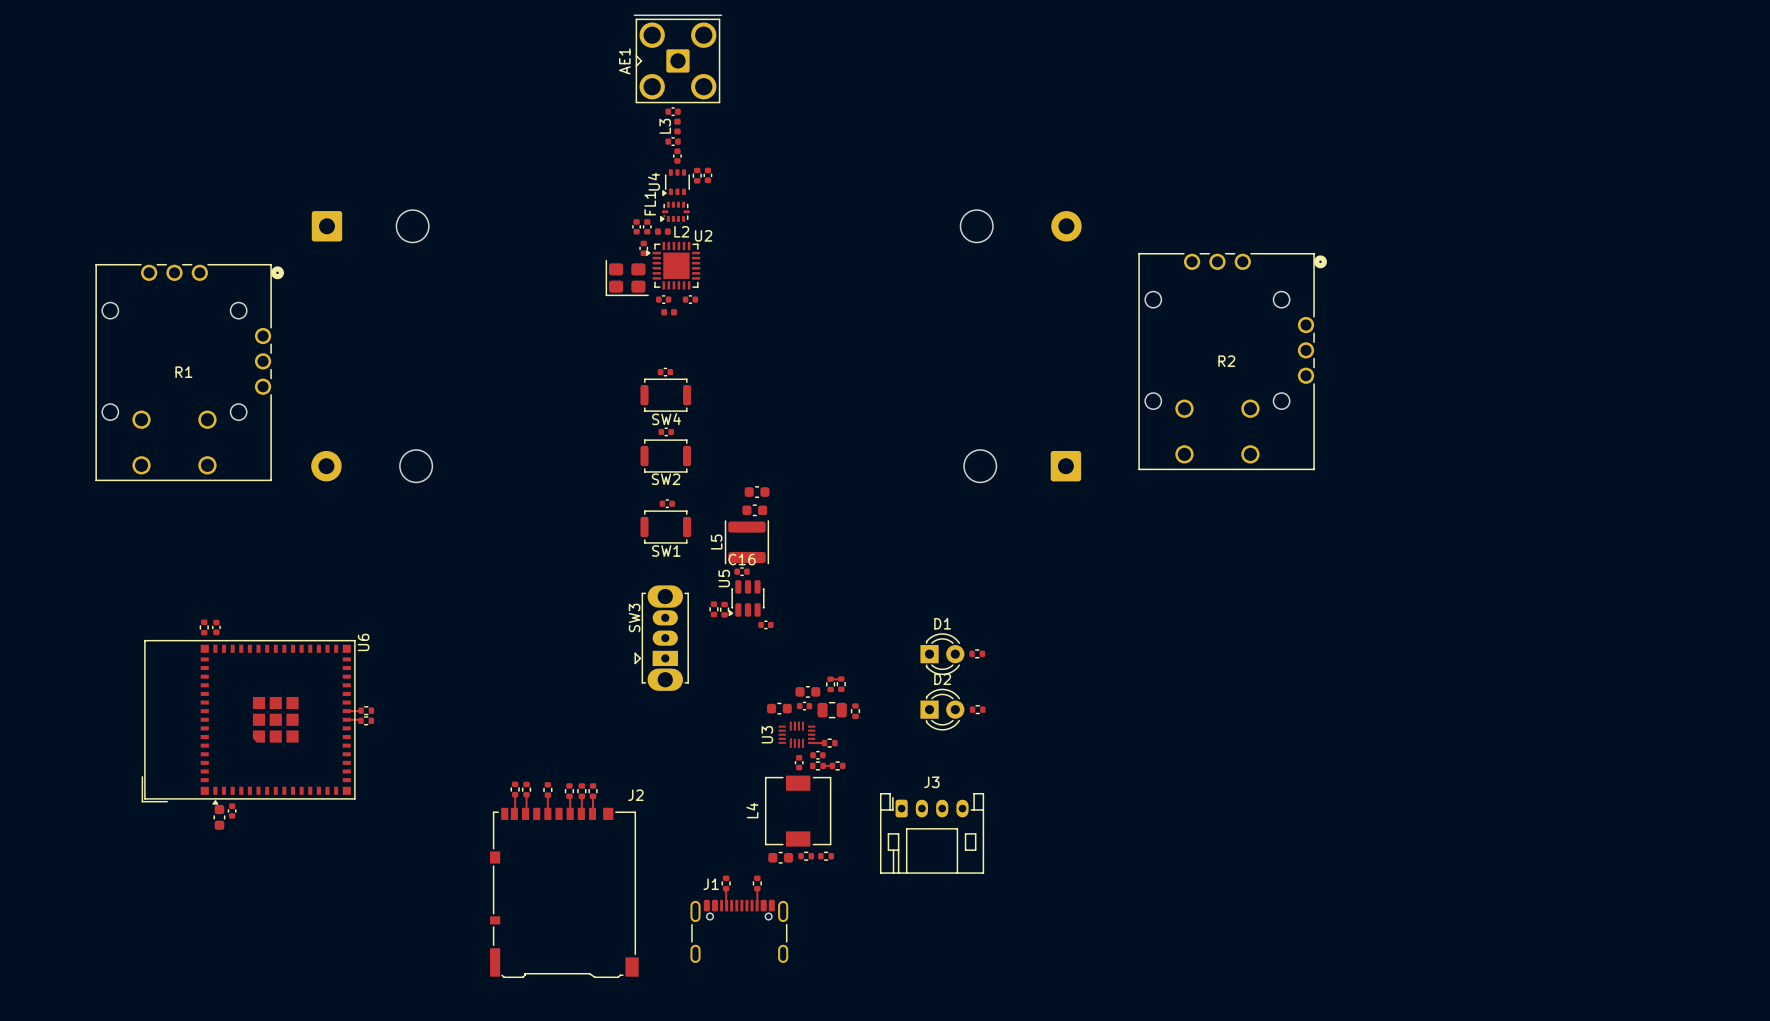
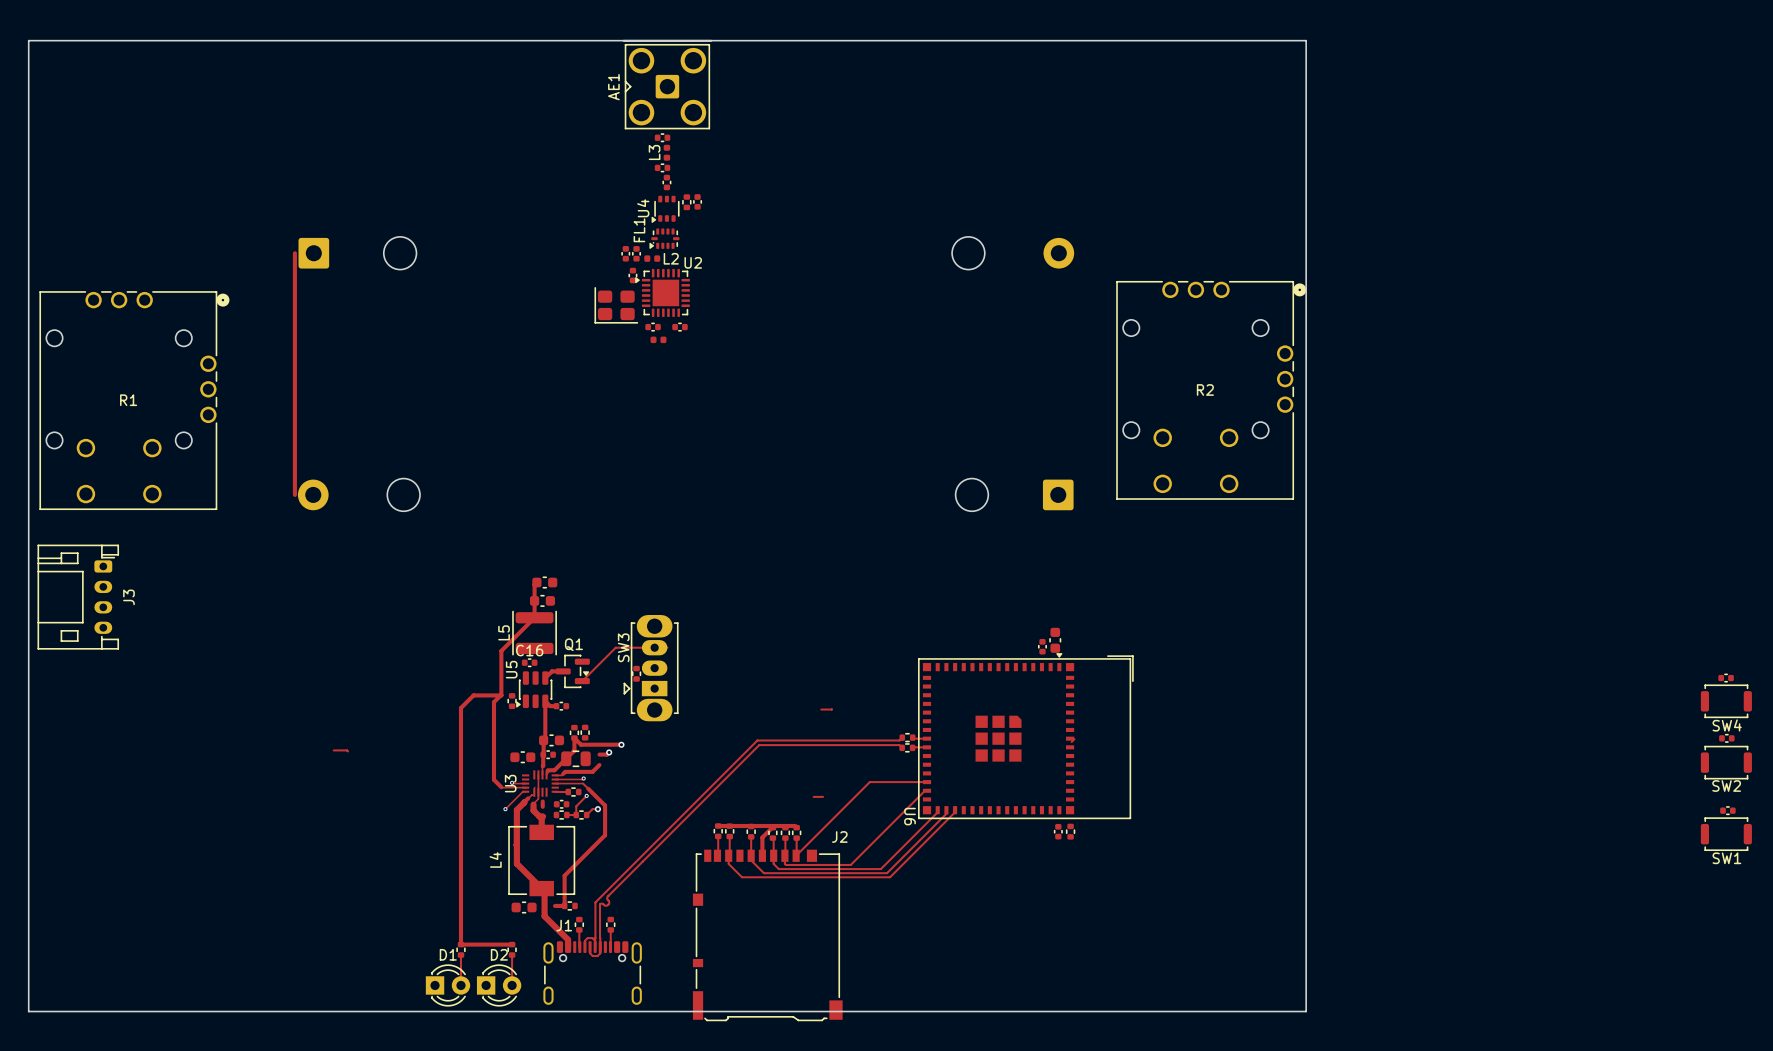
board edge: none -> (28, 40) (1306, 40) (1306, 1011) (28, 1011) (28, 40)
track: none -> (294, 253) (294, 494)
R2 position: (1232, 361) -> (1211, 390)
R1 position: (189, 372) -> (134, 400)
part: (665, 372) -> none
SW4 position: (665, 395) -> (1726, 701)
part: (666, 431) -> none
SW2 position: (665, 456) -> (1726, 762)
part: (757, 492) -> none
part: (667, 503) -> none
part: (754, 510) -> none
SW1 position: (665, 527) -> (1726, 834)
L5 position: (746, 542) -> (534, 633)
track: none -> (536, 582) (534, 584) (534, 617) (501, 650) (501, 695) (473, 695) (460, 708) (460, 944) (512, 944)
part: none -> (544, 582)
part: none -> (542, 600)
C16 position: (742, 571) -> (529, 662)
U5 position: (746, 598) -> (534, 689)
part: (713, 609) -> none
part: (724, 609) -> none
part: none -> (1055, 640)
part: none -> (1042, 646)
track: none -> (667, 647) (615, 647) (582, 681)
part: (765, 624) -> none
part: (204, 627) -> none
part: (216, 627) -> none
track: none -> (563, 671) (551, 671) (545, 678)
Q1: none -> (572, 671)
part: none -> (636, 673)
part: none -> (1726, 678)
part: (977, 653) -> none
D1 position: (942, 654) -> (448, 985)
track: none -> (500, 695) (493, 702) (493, 779) (501, 787) (525, 787)
part: none -> (512, 701)
track: none -> (556, 706) (550, 706) (545, 701) (542, 774)
part: none -> (561, 706)
part: (830, 684) -> none
part: (841, 684) -> none
part: (807, 691) -> none
part: none -> (574, 732)
part: none -> (585, 732)
part: (804, 706) -> none
track: none -> (574, 738) (574, 750) (566, 758)
track: none -> (574, 738) (580, 744) (621, 744)
track: none -> (902, 737) (899, 740) (757, 740) (595, 902) (595, 947)
part: none -> (907, 737)
track: none -> (912, 737) (927, 738)
part: none -> (1726, 738)
part: (779, 708) -> none
track: none -> (1074, 739) (1071, 742)
part: none -> (551, 740)
D2 position: (942, 709) -> (499, 985)
part: (977, 709) -> none
track: (361, 710) (346, 711) -> none
part: (366, 710) -> none
part position: (832, 710) -> (575, 758)
part: (855, 711) -> none
via: none -> (621, 744)
track: none -> (927, 747) (912, 747)
track: none -> (902, 747) (899, 745) (759, 745) (607, 896) (609, 902) (607, 905) (600, 904) (600, 953) (597, 956) (592, 956) (590, 953) (590, 947)
part: none -> (907, 747)
part: (366, 720) -> none
track: none -> (609, 752) (607, 754) (599, 754)
via: none -> (609, 752)
U6 rotation: 0° (248, 722) -> 180° (1025, 736)
U6 position: (248, 722) -> (1025, 736)
part: none -> (548, 754)
part: none -> (522, 757)
track: none -> (566, 758) (554, 770) (547, 770)
track: none -> (599, 765) (592, 771) (565, 771) (561, 775) (555, 775)
U3 position: (796, 734) -> (540, 783)
track: none -> (549, 771) (546, 774)
track: (811, 742) (824, 743) -> (555, 791) (568, 792)
part: (829, 743) -> none
track: none -> (538, 774) (538, 798) (533, 803) (533, 810) (539, 816) (542, 816) (541, 832)
track: none -> (583, 778) (555, 779)
via: none -> (583, 778)
track: none -> (512, 782) (525, 783)
via: none -> (512, 782)
track: none -> (927, 782) (869, 782) (796, 855)
track: none -> (555, 783) (583, 783) (605, 805) (605, 835) (564, 875) (564, 905) (555, 905)
part: (817, 755) -> none
track: none -> (927, 790) (850, 864) (785, 864) (785, 838)
track: none -> (525, 791) (522, 791) (505, 809)
part: none -> (573, 792)
part: (799, 762) -> none
track: none -> (534, 795) (526, 799)
track: none -> (586, 795) (576, 806) (576, 815) (566, 815)
via: none -> (586, 795)
part: (817, 765) -> none
part: (837, 765) -> none
track: none -> (528, 798) (516, 810) (516, 863) (544, 891) (544, 916) (568, 939) (568, 947)
track: none -> (542, 801) (542, 806)
part: none -> (561, 804)
via: none -> (505, 809)
track: none -> (597, 809) (592, 809) (586, 815)
via: none -> (597, 809)
track: none -> (937, 810) (880, 869) (778, 869) (773, 863) (772, 838)
track: none -> (946, 810) (946, 813) (887, 873) (763, 873) (751, 860) (751, 836)
track: none -> (955, 810) (890, 877) (742, 877) (728, 863) (729, 836)
part: none -> (1727, 810)
part: none -> (561, 815)
part: none -> (581, 815)
part: (515, 789) -> none
part: (526, 789) -> none
part: (547, 789) -> none
part: (569, 791) -> none
part: (581, 791) -> none
part: (593, 791) -> none
track: (515, 794) (514, 813) -> (718, 836) (717, 855)
track: none -> (718, 825) (794, 825) (796, 827)
track: (547, 795) (547, 813) -> none
track: (569, 796) (570, 813) -> none
track: (581, 796) (581, 813) -> none
track: (593, 796) (592, 813) -> none
track: none -> (772, 827) (762, 837) (762, 855)
part: none -> (718, 831)
part: none -> (729, 831)
part: none -> (751, 831)
part: none -> (1058, 831)
part: none -> (1070, 831)
part: none -> (772, 832)
part: none -> (785, 832)
part: none -> (796, 832)
track: none -> (796, 838) (796, 855)
part: (232, 811) -> none
L4 position: (798, 811) -> (541, 860)
part: (219, 817) -> none
J3 rotation: 0° (932, 833) -> 90° clockwise (78, 597)
J3 position: (932, 833) -> (78, 597)
part: (806, 856) -> none
part: (826, 856) -> none
part: (780, 857) -> none
part: none -> (569, 905)
part: none -> (524, 907)
part: (726, 883) -> none
part: (757, 883) -> none
track: (726, 888) (726, 905) -> (579, 929) (579, 947)
track: (757, 888) (757, 905) -> (610, 929) (610, 947)
J2 position: (564, 892) -> (767, 935)
part: none -> (579, 924)
part: none -> (610, 924)
track: none -> (595, 940) (592, 938) (587, 938) (584, 940) (584, 947)
part: none -> (460, 949)
part: none -> (512, 949)
track: none -> (460, 955) (460, 985)
track: none -> (512, 955) (512, 985)
J1 position: (739, 931) -> (592, 973)

